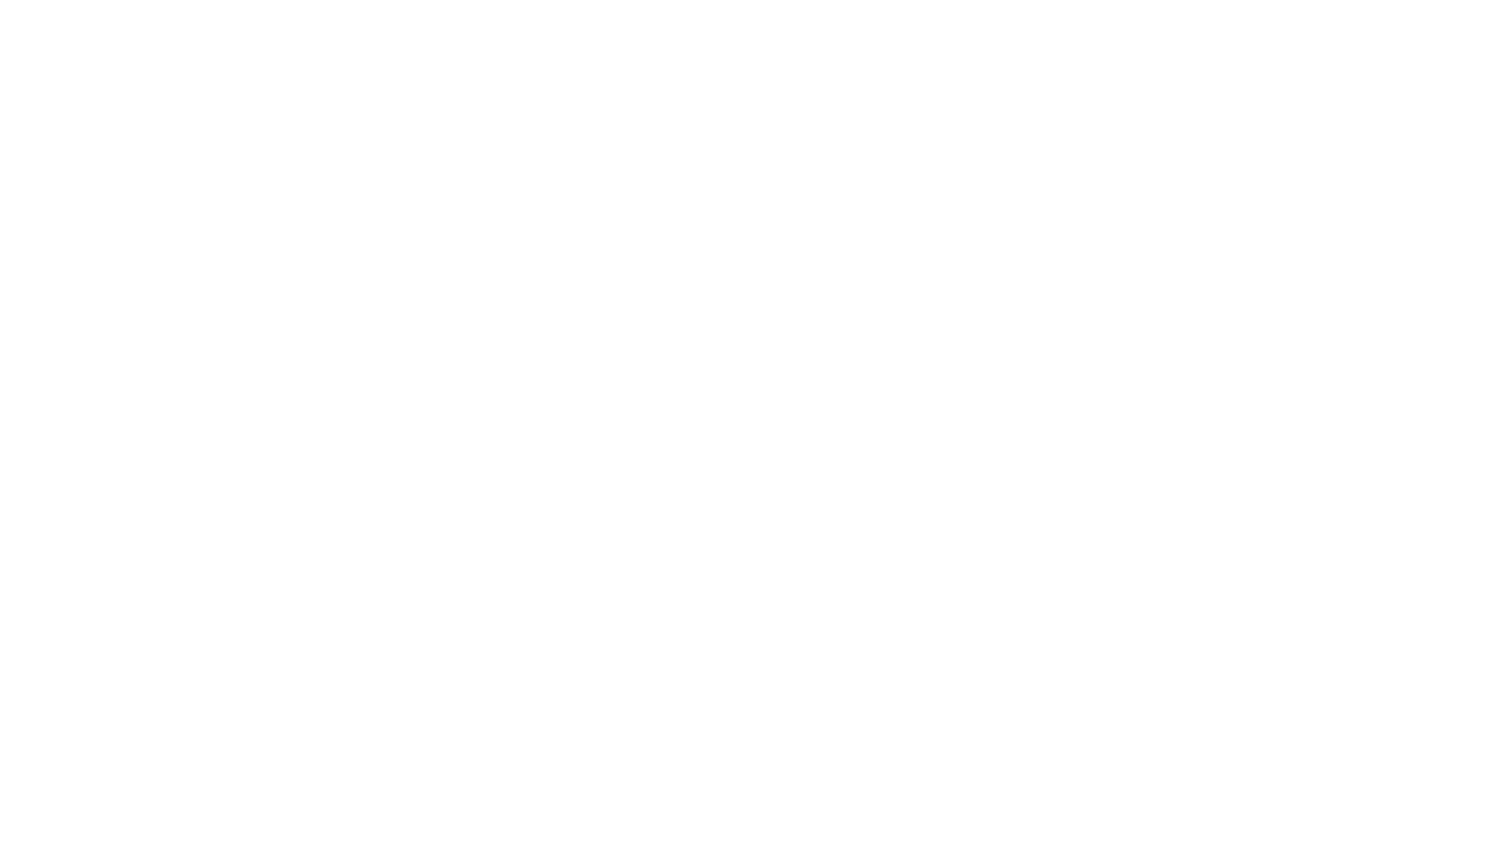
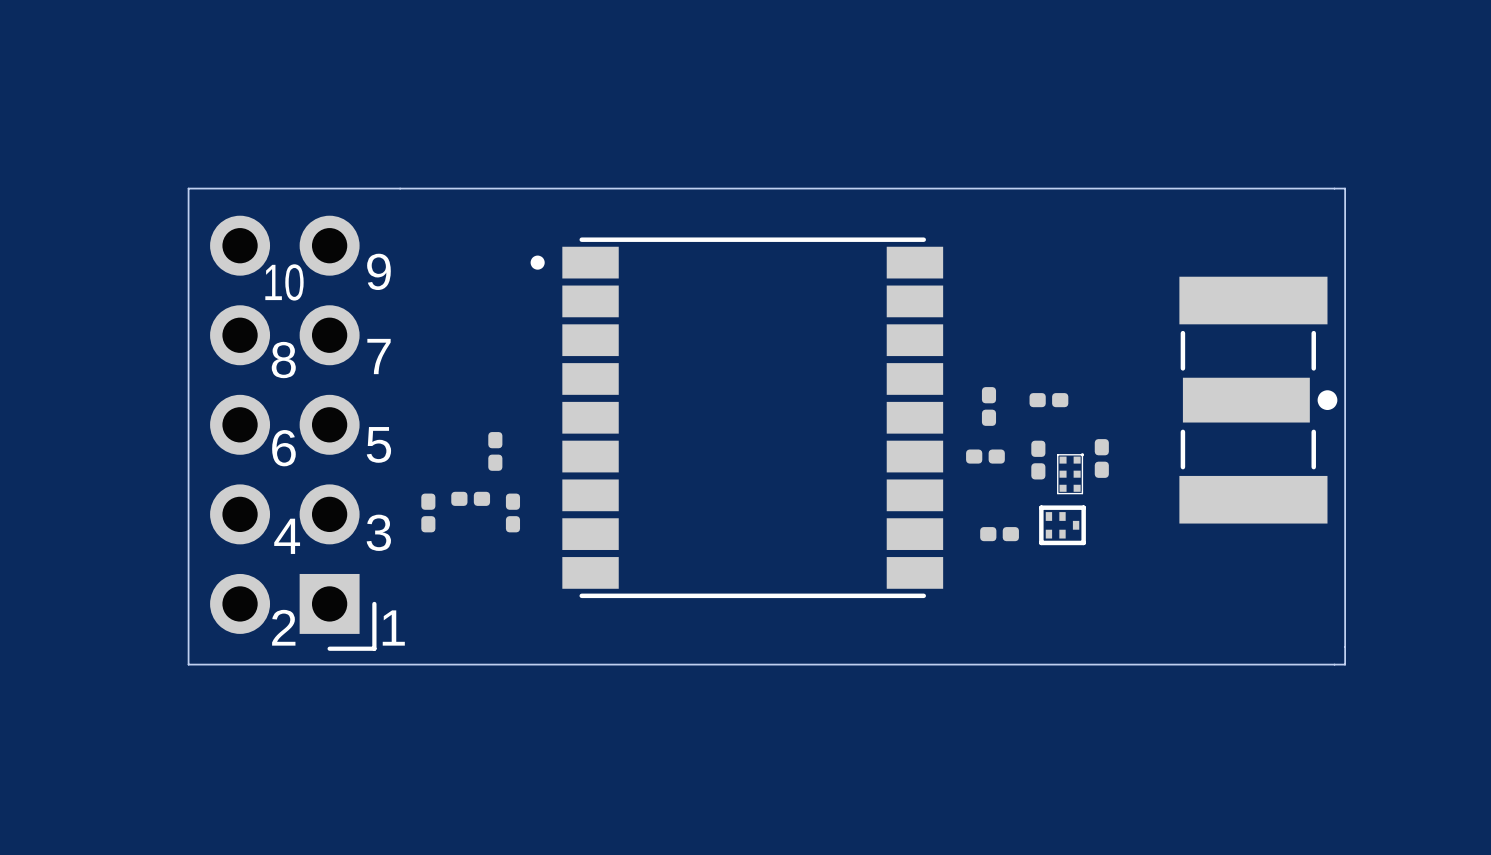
board edge: none -> (188, 188) (1345, 188) (1345, 664) (188, 664) (188, 188)
text: none -> 9 (378, 271)
text: none -> 10 (284, 282)
text: none -> 7 (379, 356)
text: none -> 8 (283, 360)
part: none -> (1048, 400)
part: none -> (1258, 400)
part: none -> (988, 406)
part: none -> (736, 417)
part: none -> (293, 433)
text: none -> 5 (378, 444)
text: none -> 6 (283, 448)
part: none -> (495, 451)
part: none -> (985, 456)
part: none -> (1101, 458)
part: none -> (1038, 460)
part: none -> (1070, 473)
part: none -> (470, 498)
part: none -> (428, 512)
part: none -> (512, 512)
part: none -> (1062, 525)
text: none -> 3 (378, 532)
part: none -> (999, 534)
text: none -> 4 (287, 536)
text: none -> 2 (283, 627)
text: none -> 1 (393, 628)

